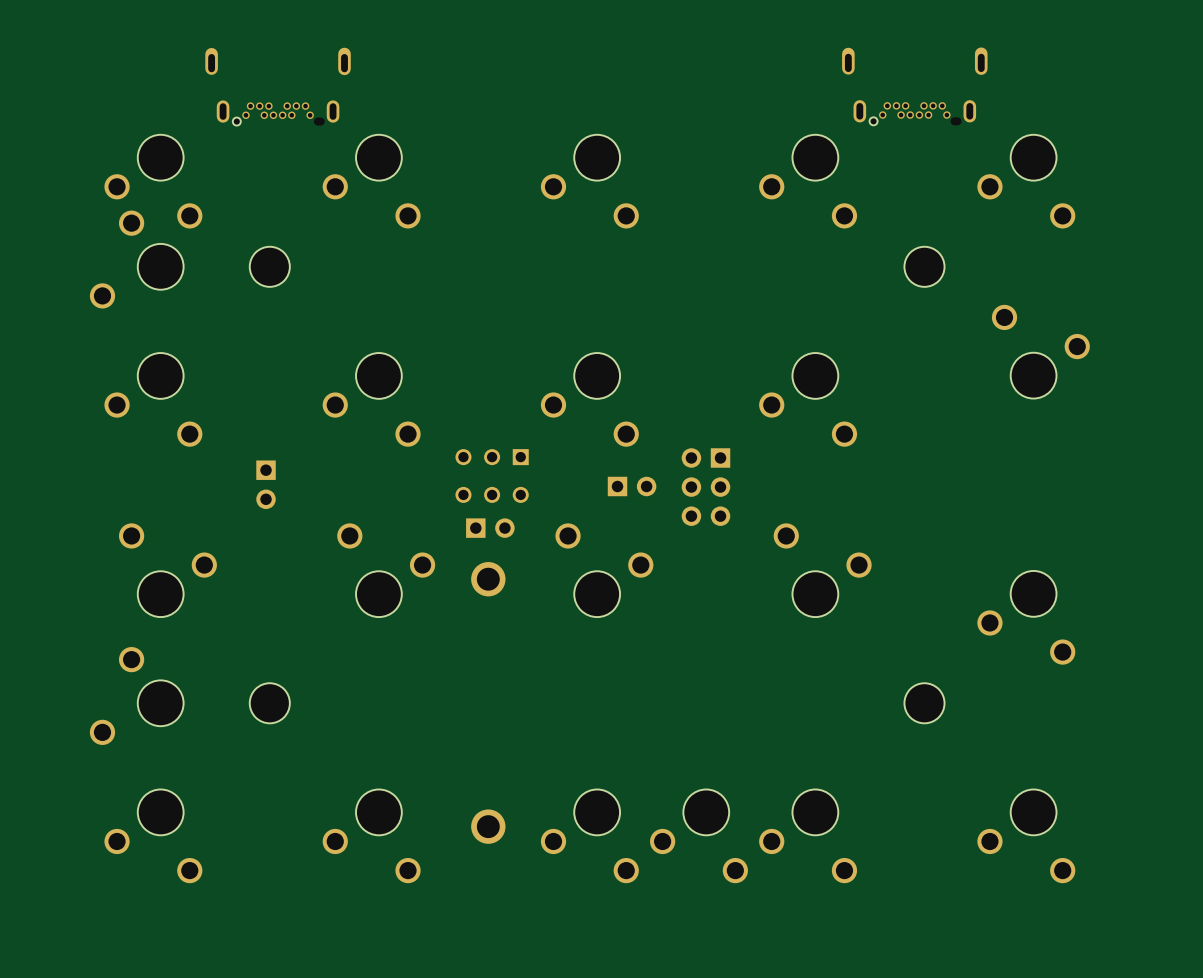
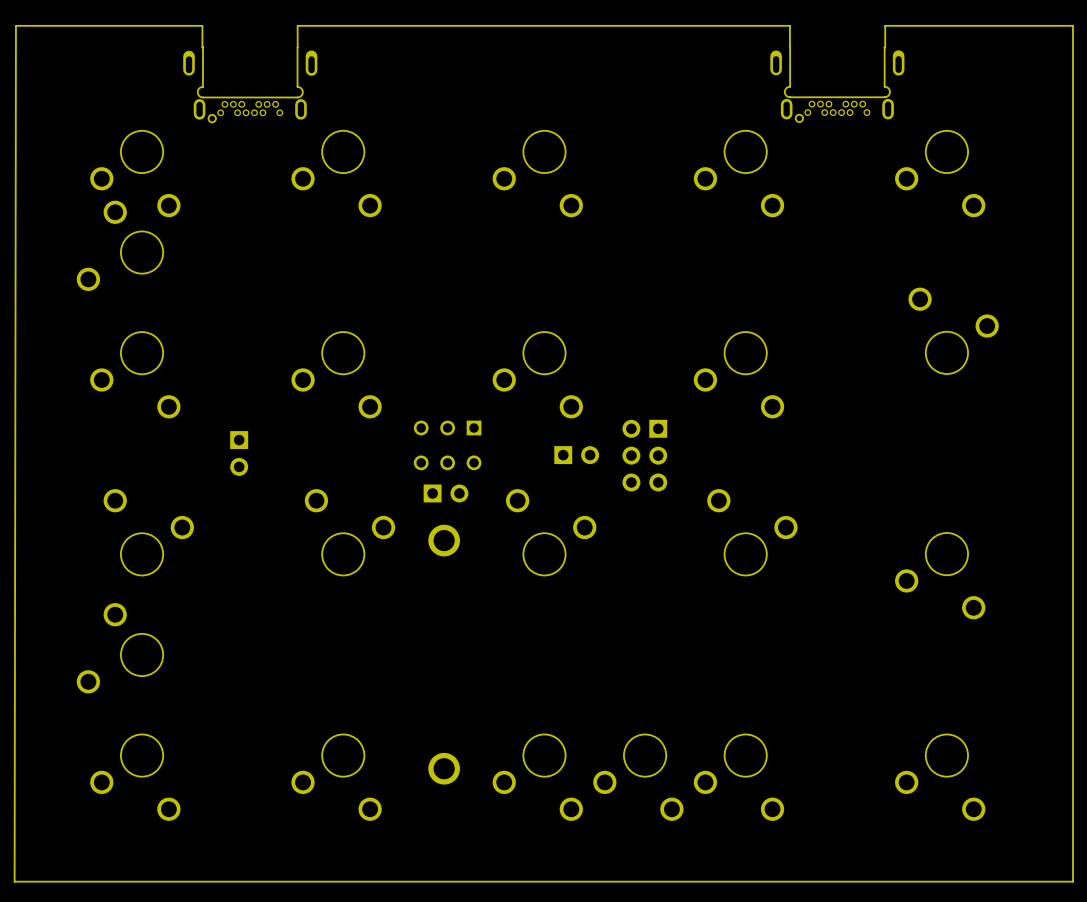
board edge: none -> (789, 47) (789, 25) (297, 25) (297, 47)
board edge: none -> (884, 47) (885, 25) (1073, 25) (1073, 881) (14, 881) (15, 25) (202, 25) (203, 47)
part footprint: [205, 47, 351, 126] -> [183, 46, 318, 123]
part footprint: [842, 47, 988, 126] -> [770, 46, 905, 123]
part: (269, 266) -> none
part: (924, 266) -> none
part: (269, 703) -> none
part: (924, 703) -> none

